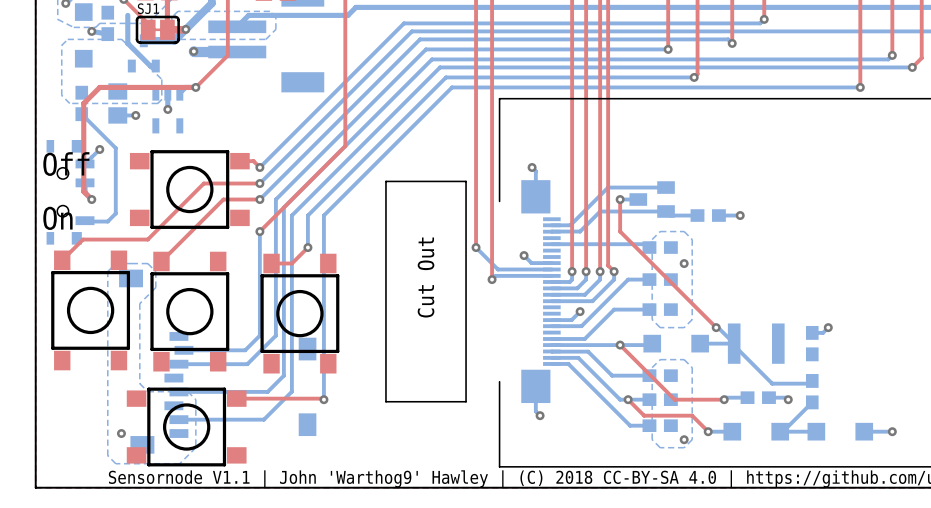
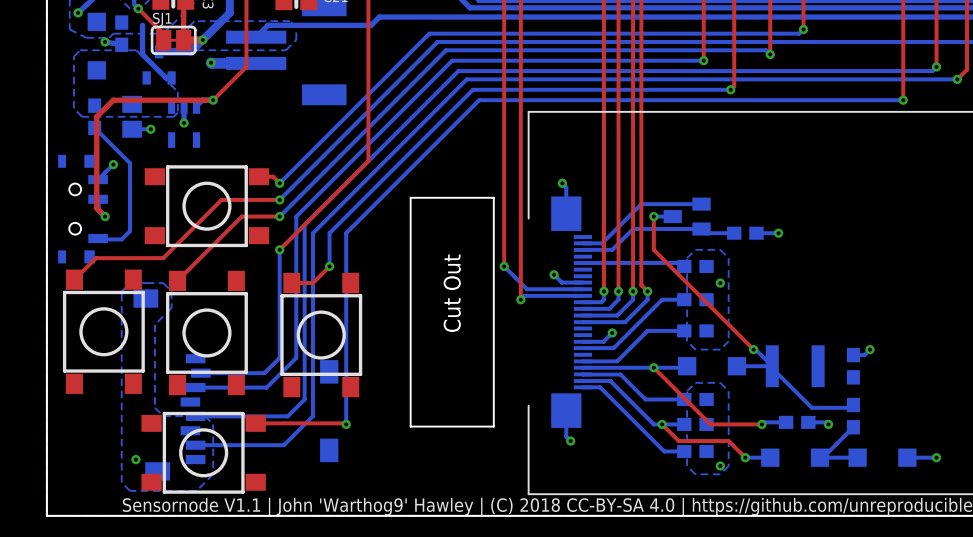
text: Off (66, 164) -> none
text: On (57, 218) -> none

